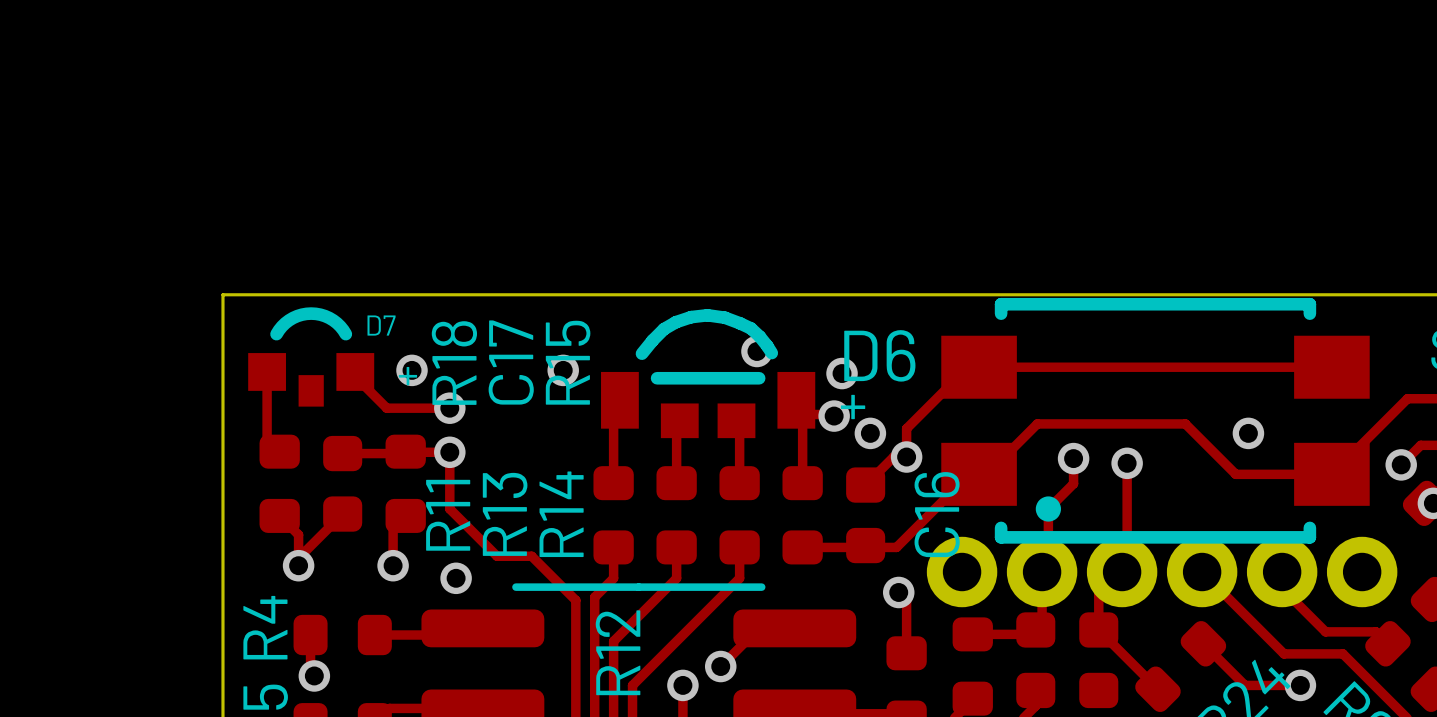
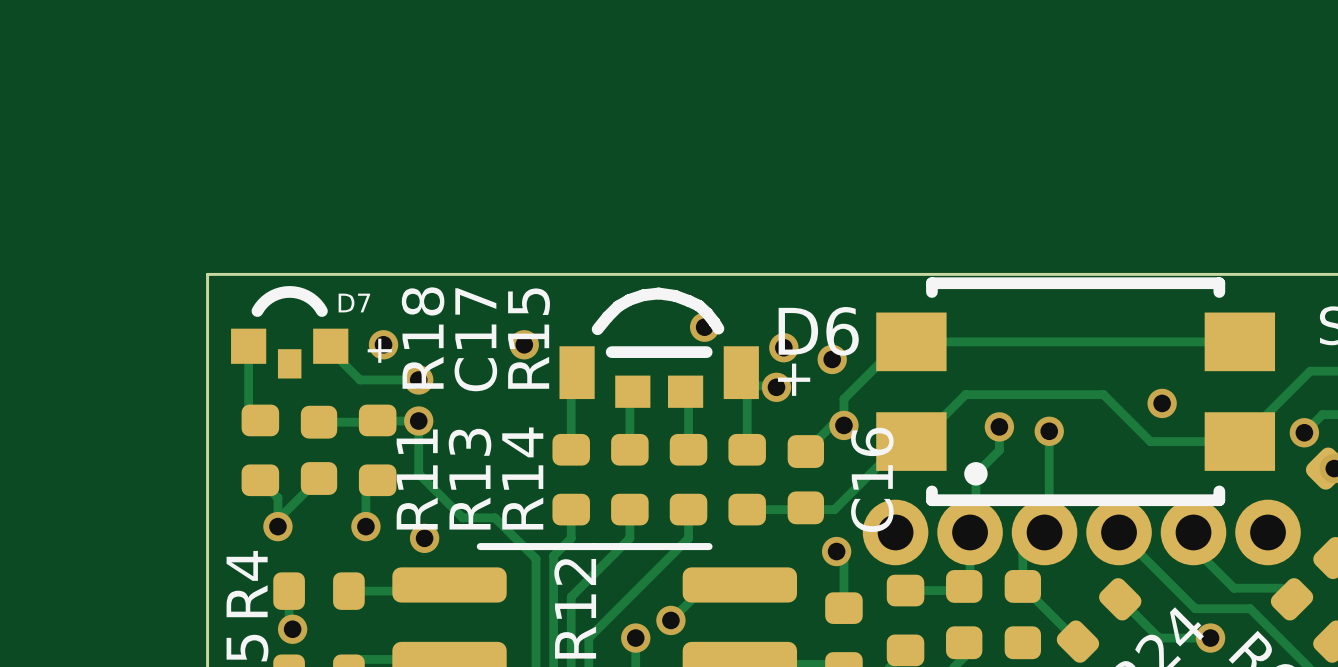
via position: (870, 433) -> (832, 359)

